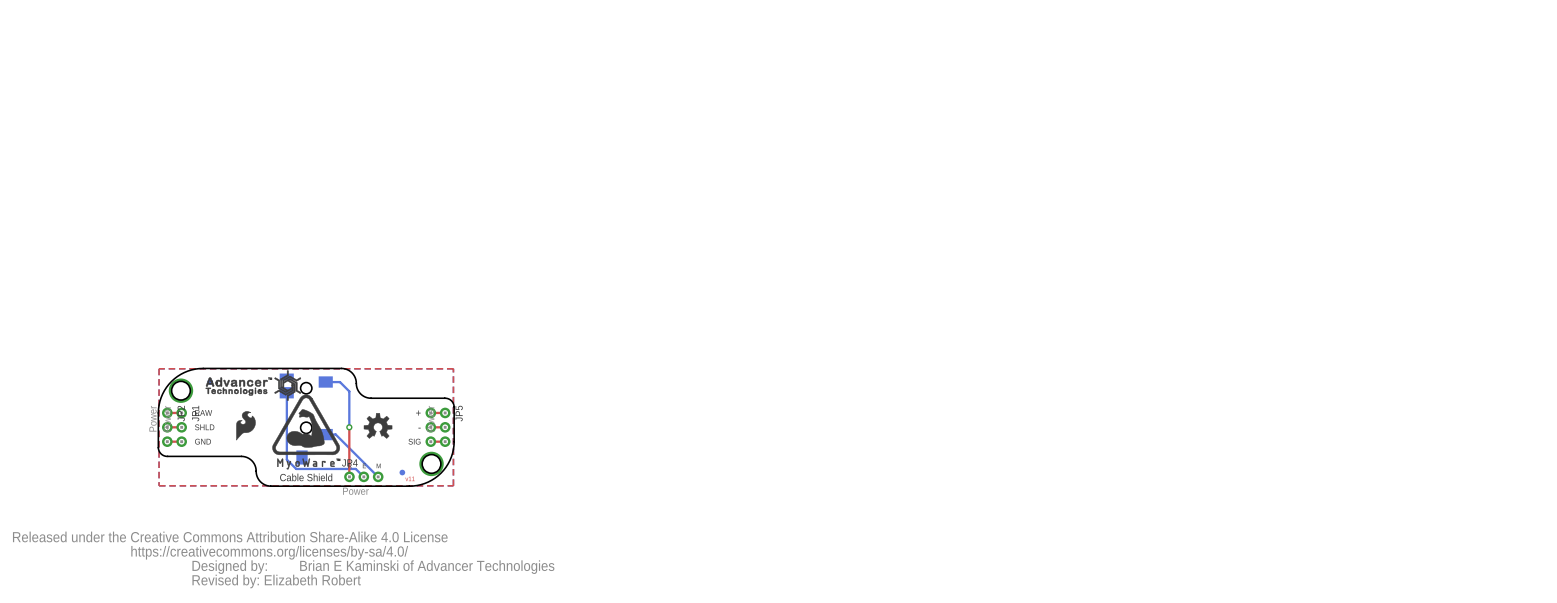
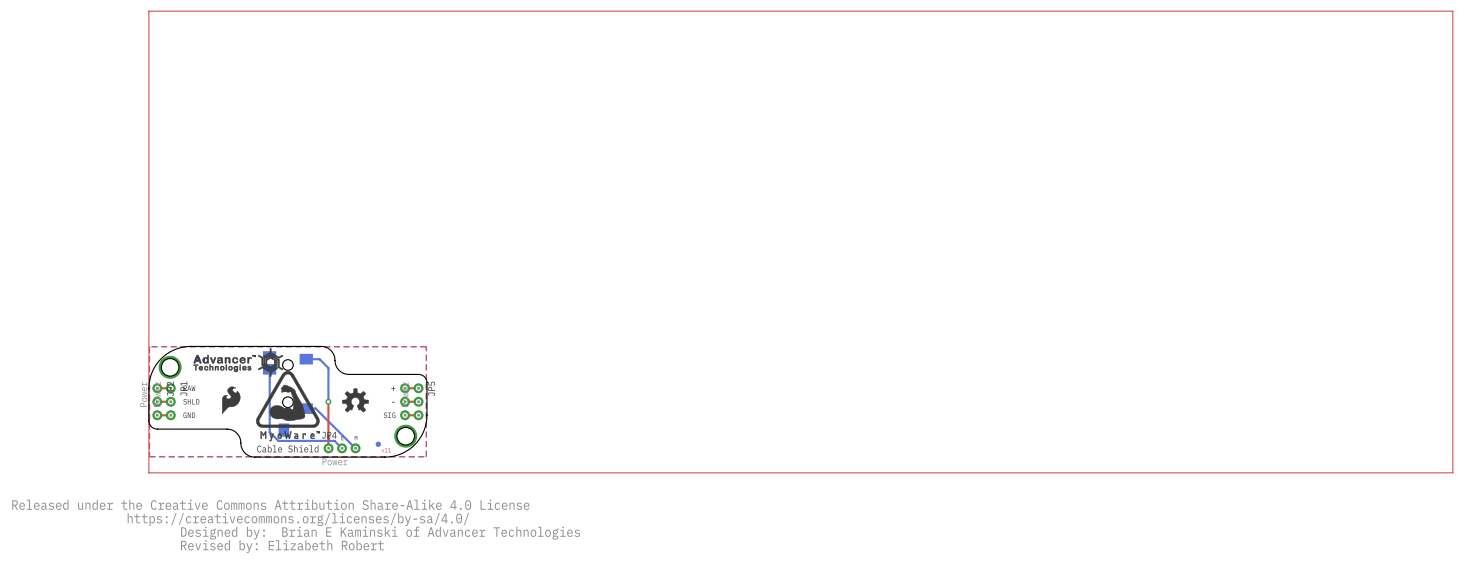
top track: none -> (148, 11) (1452, 11) (1452, 472) (148, 472) (148, 11)

